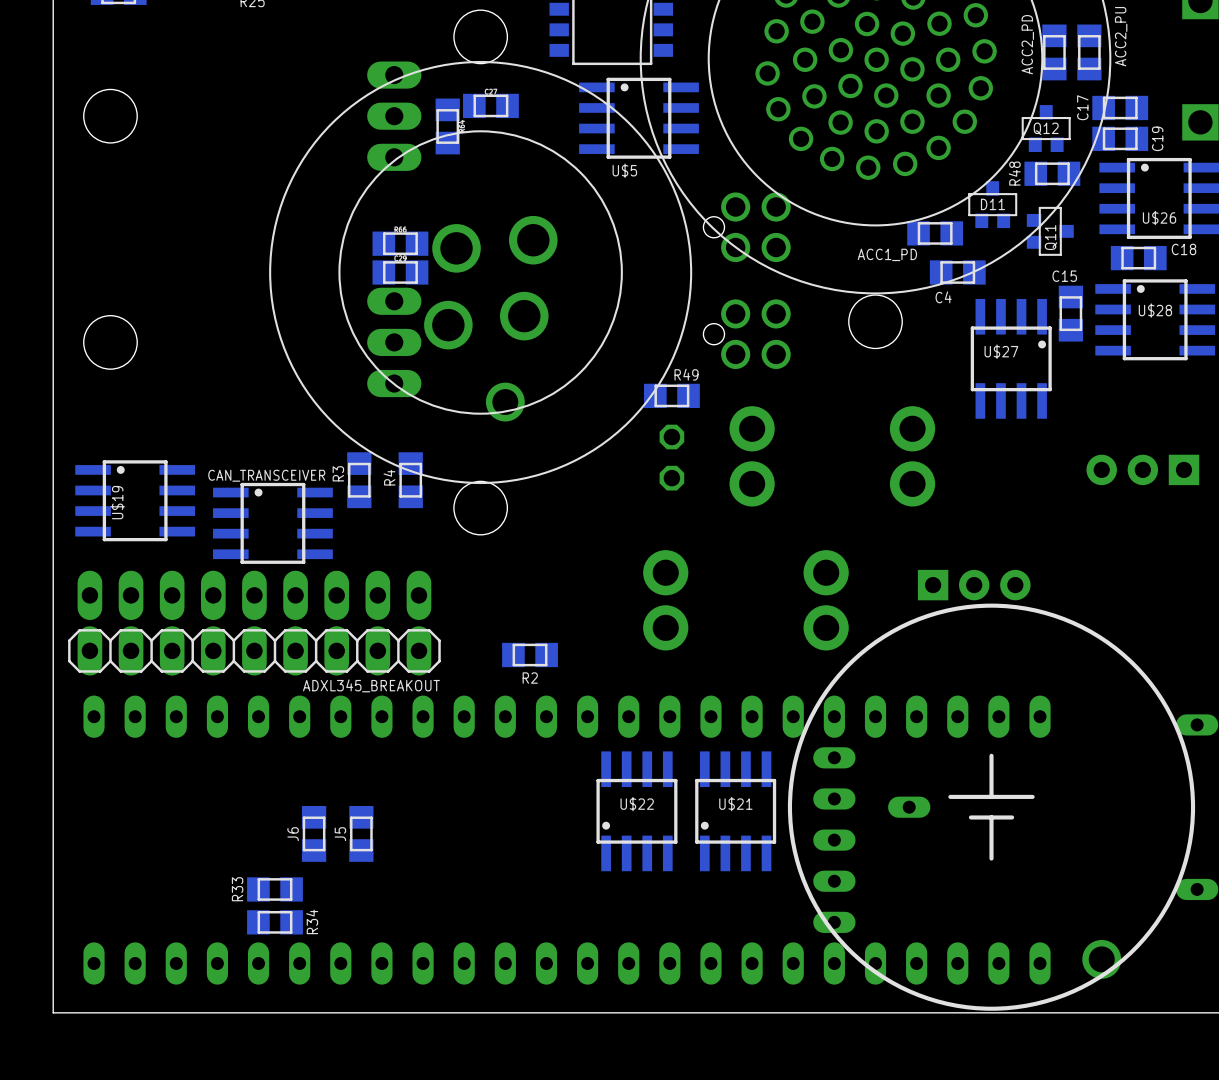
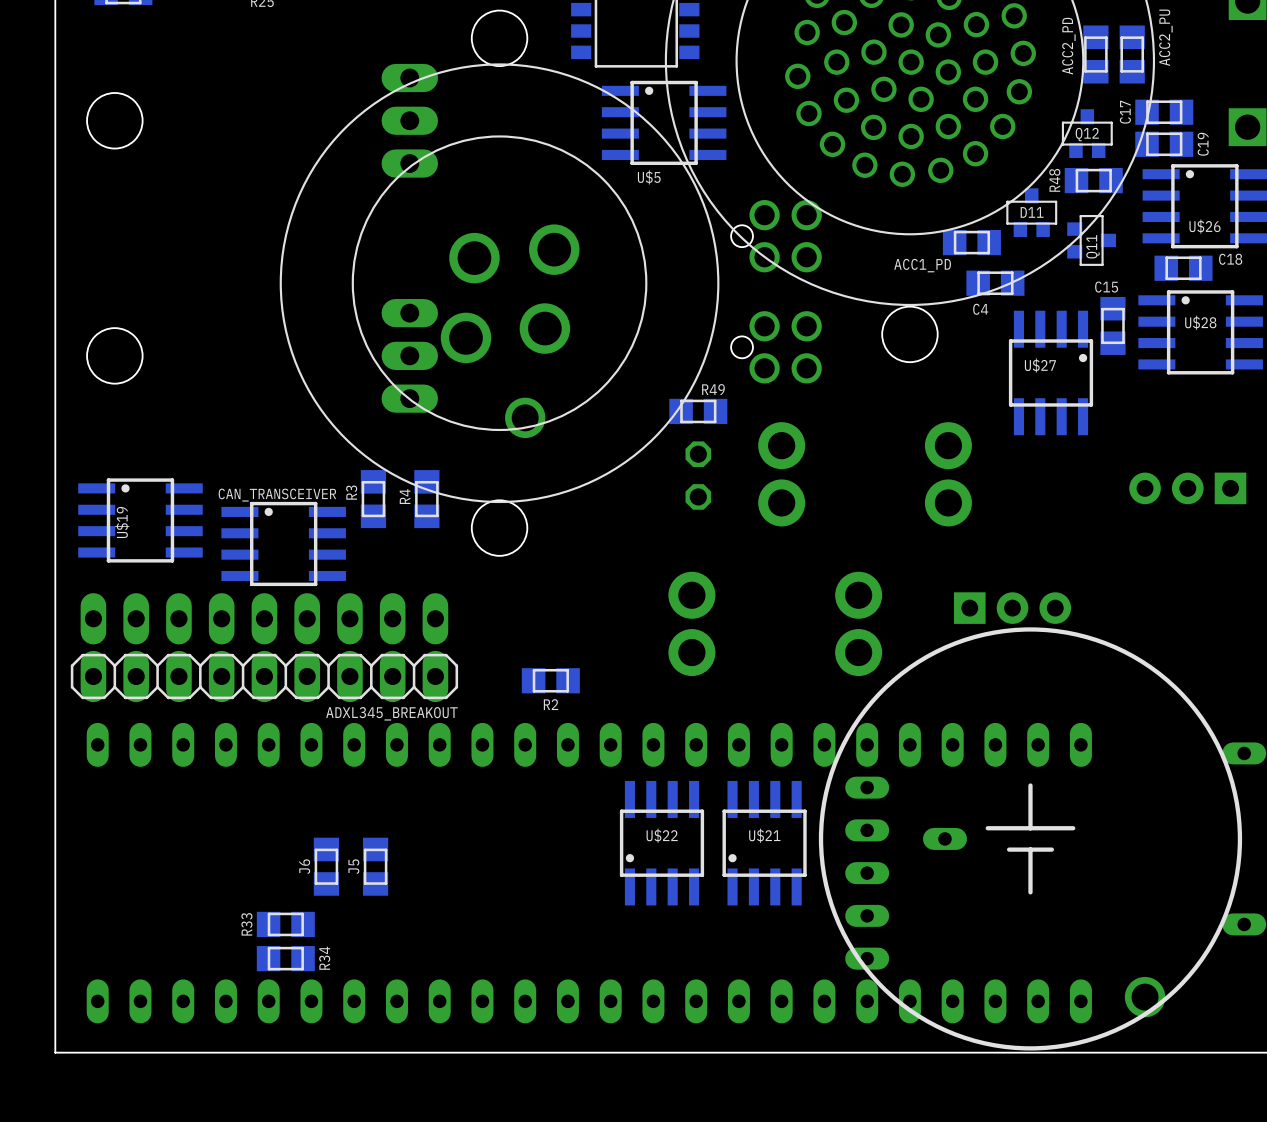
part: (490, 105) -> none
part: (447, 126) -> none
part: (400, 243) -> none
part: (400, 272) -> none

